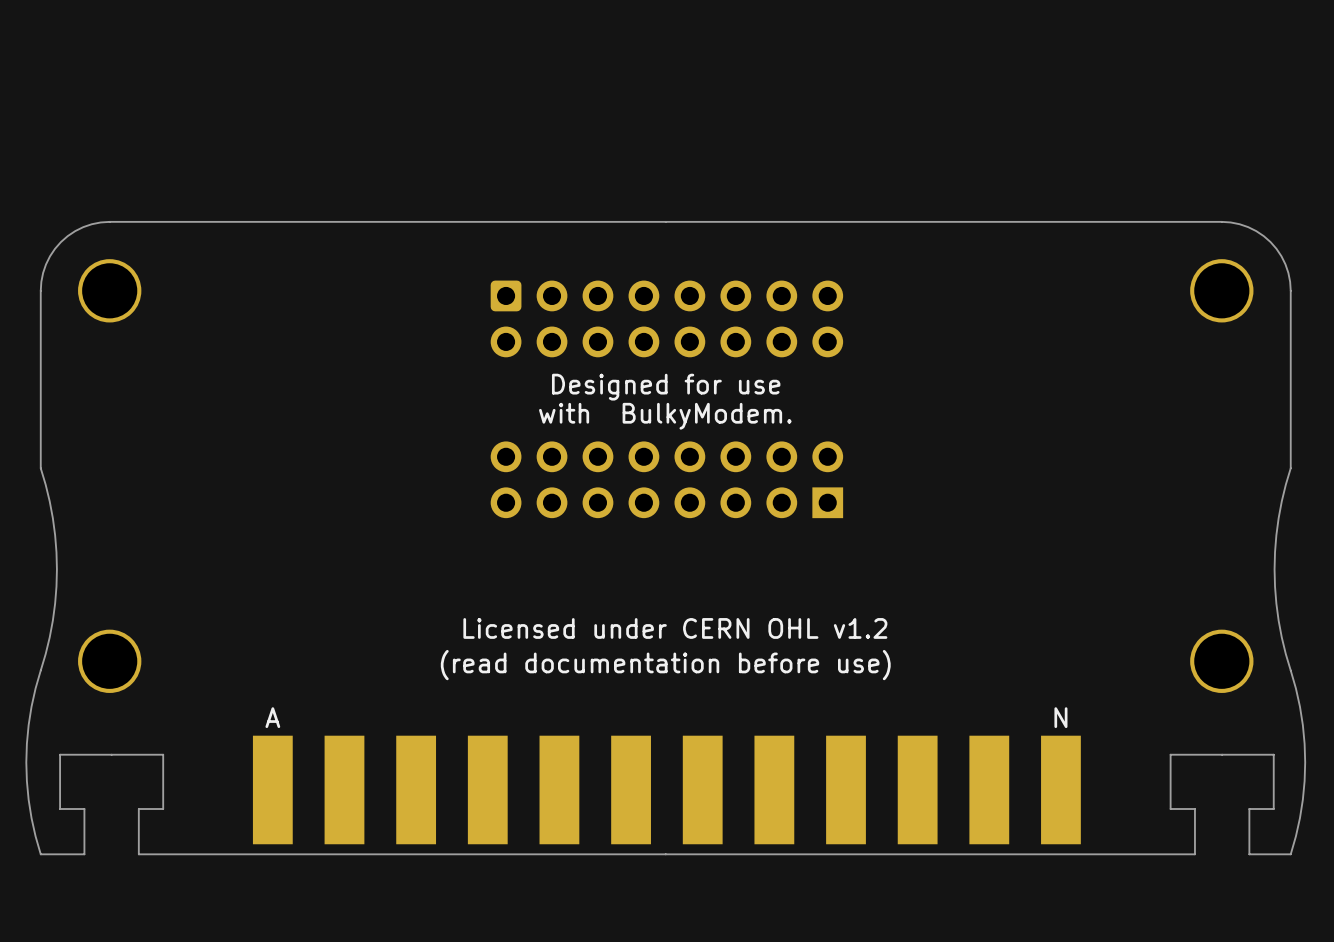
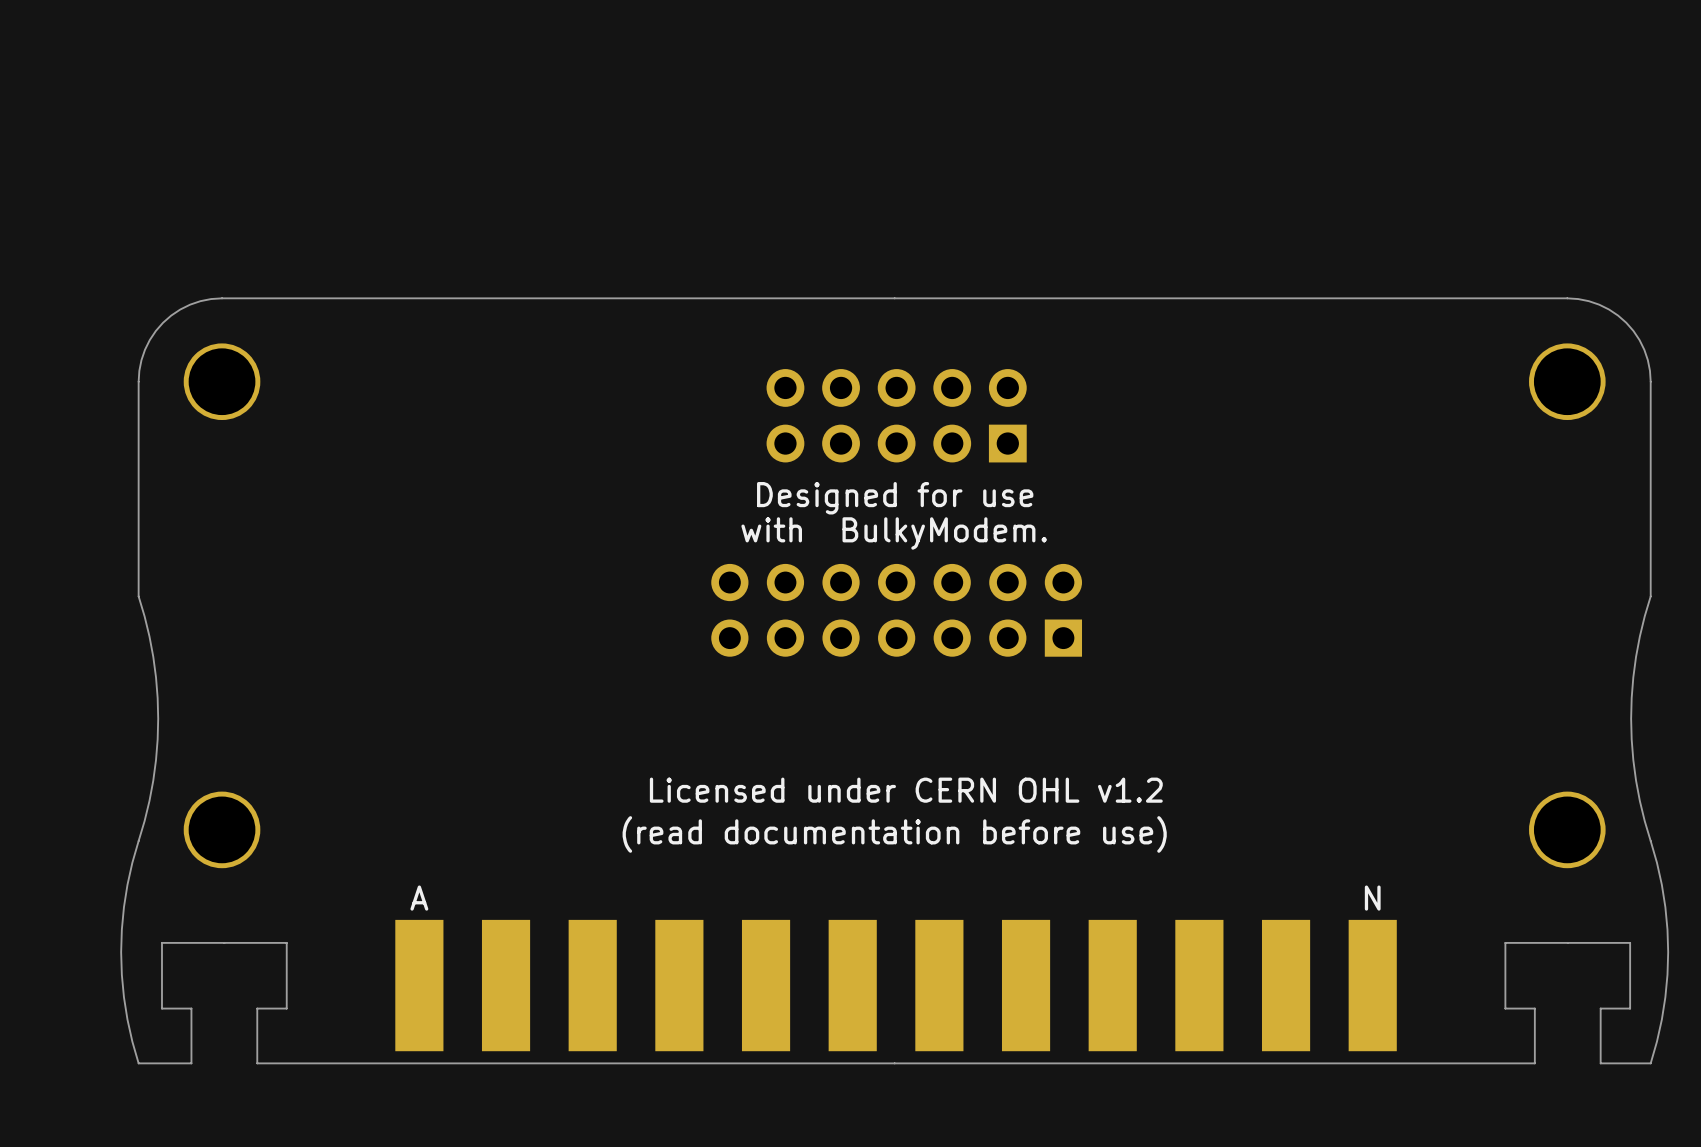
part footprint: [490, 280, 844, 358] -> [766, 369, 1027, 463]
part footprint: [490, 441, 844, 519] -> [711, 563, 1083, 657]

